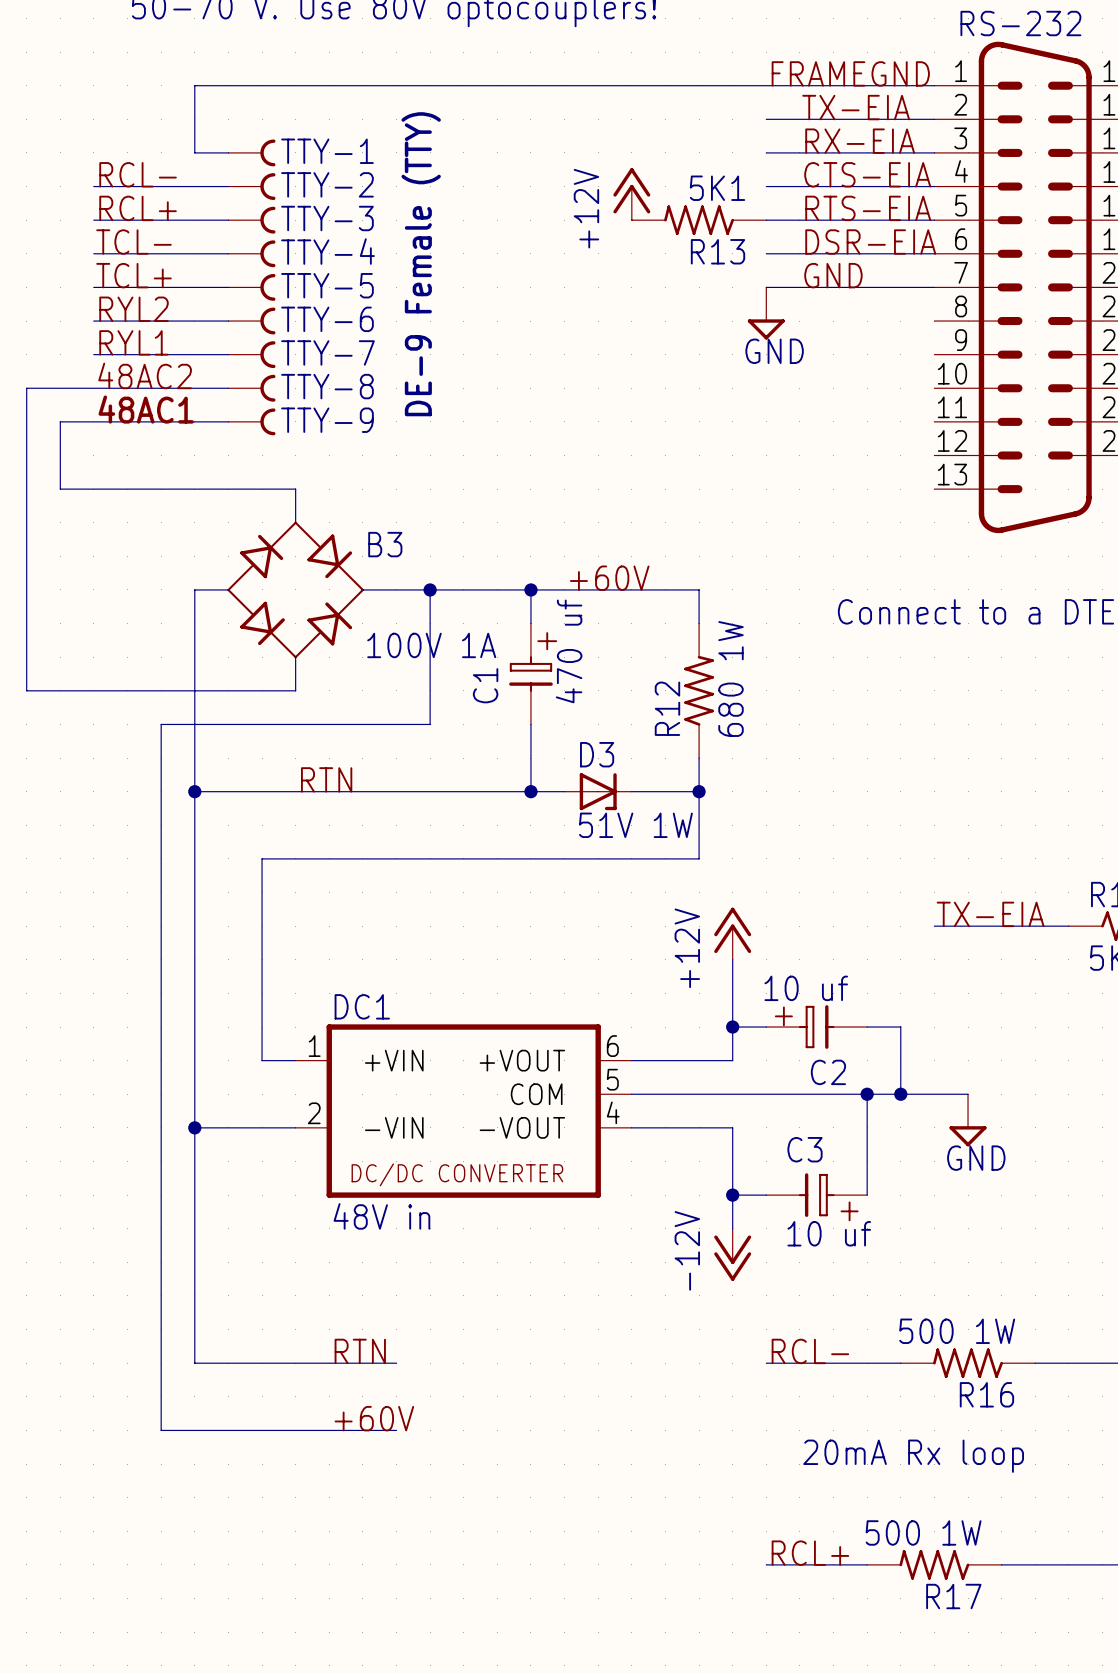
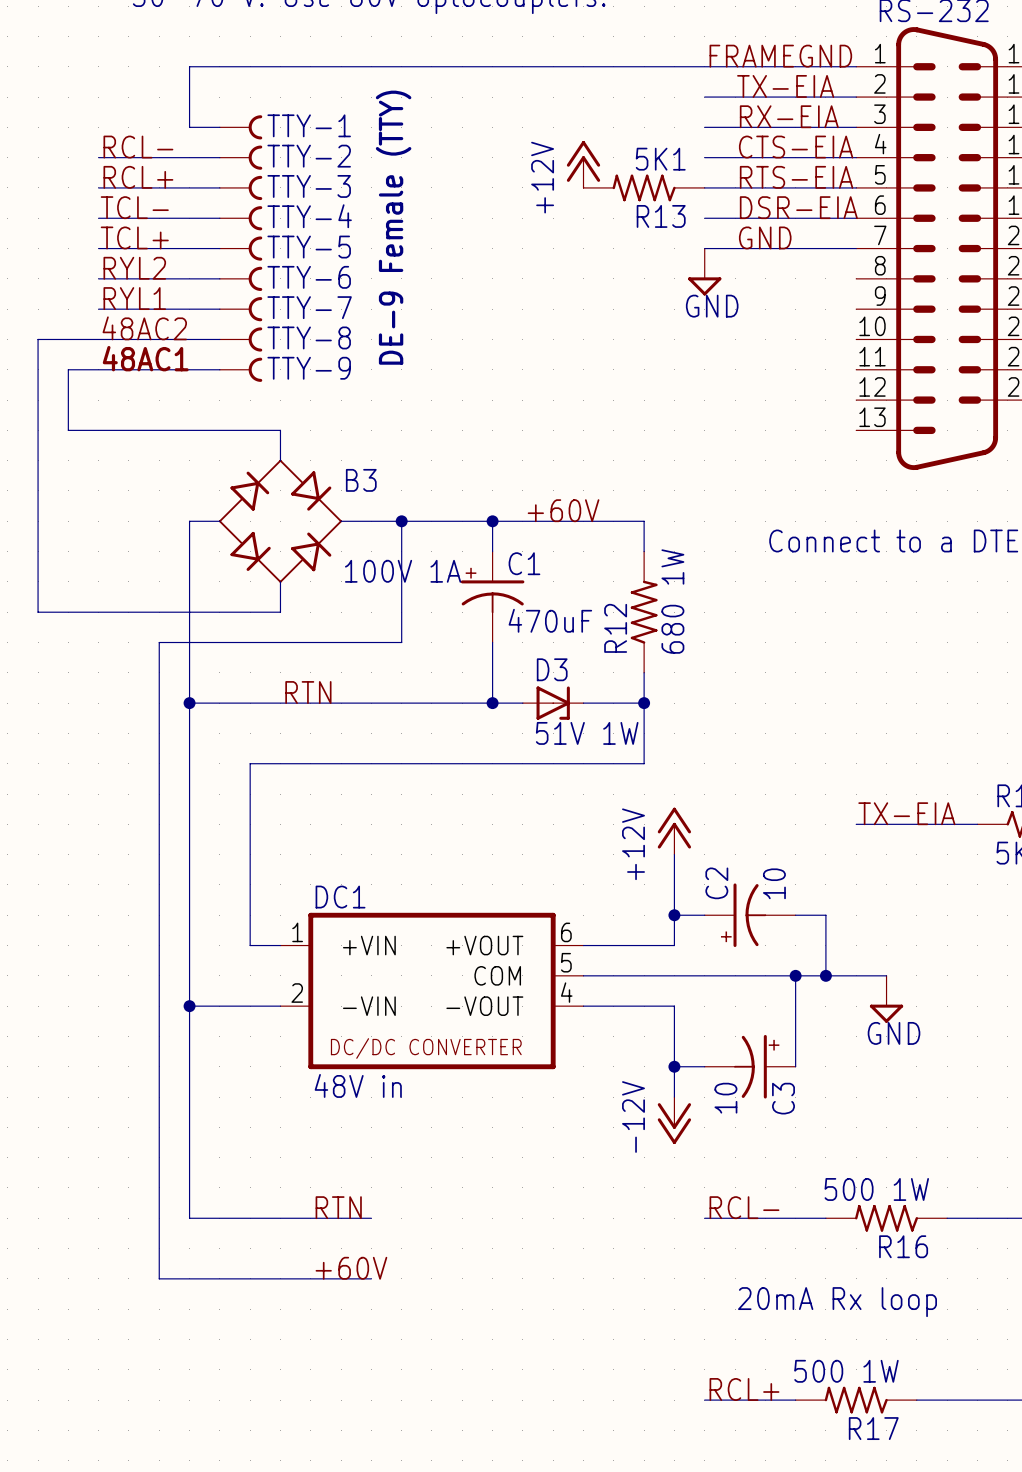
C1 symbol: [509, 623, 553, 725] -> [460, 551, 525, 643]
C1 value: 470 uf (569, 651) -> 470uF (550, 620)
C1 name position: C1 (485, 685) -> C1 (524, 563)
C2 value: 10 uf (806, 988) -> 10 (774, 883)
C2 symbol: [766, 1005, 868, 1049] -> [704, 883, 796, 948]
C2 name position: C2 (828, 1072) -> C2 (716, 883)
C3 name position: C3 (805, 1149) -> C3 (783, 1098)
C3 symbol: [766, 1173, 868, 1217] -> [704, 1034, 796, 1099]
C3 value: 10 uf (829, 1233) -> 10 (725, 1098)

